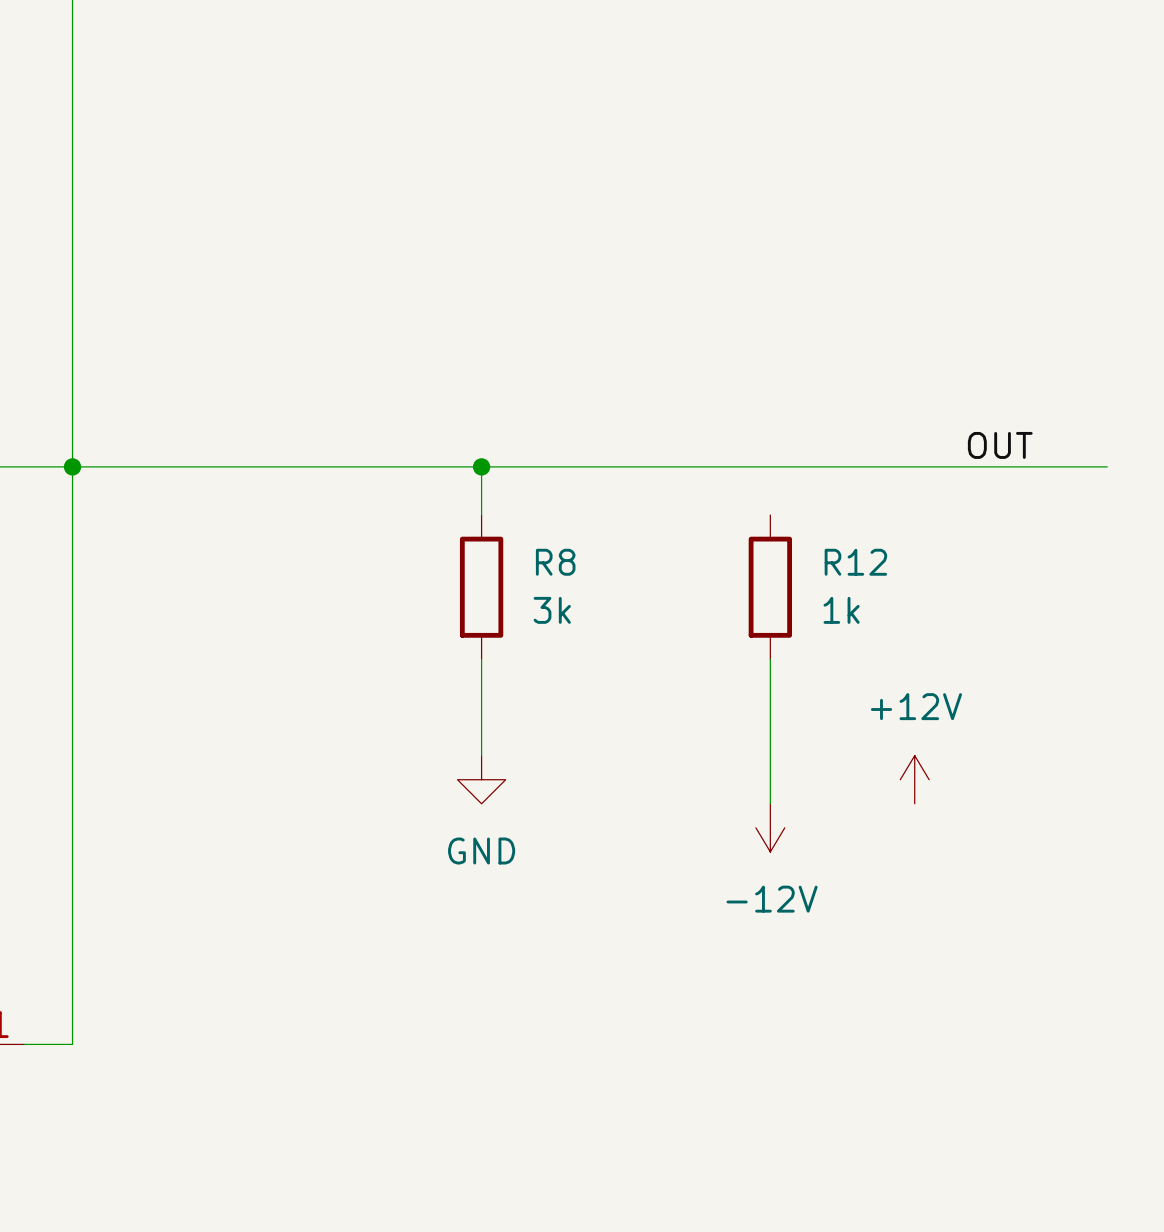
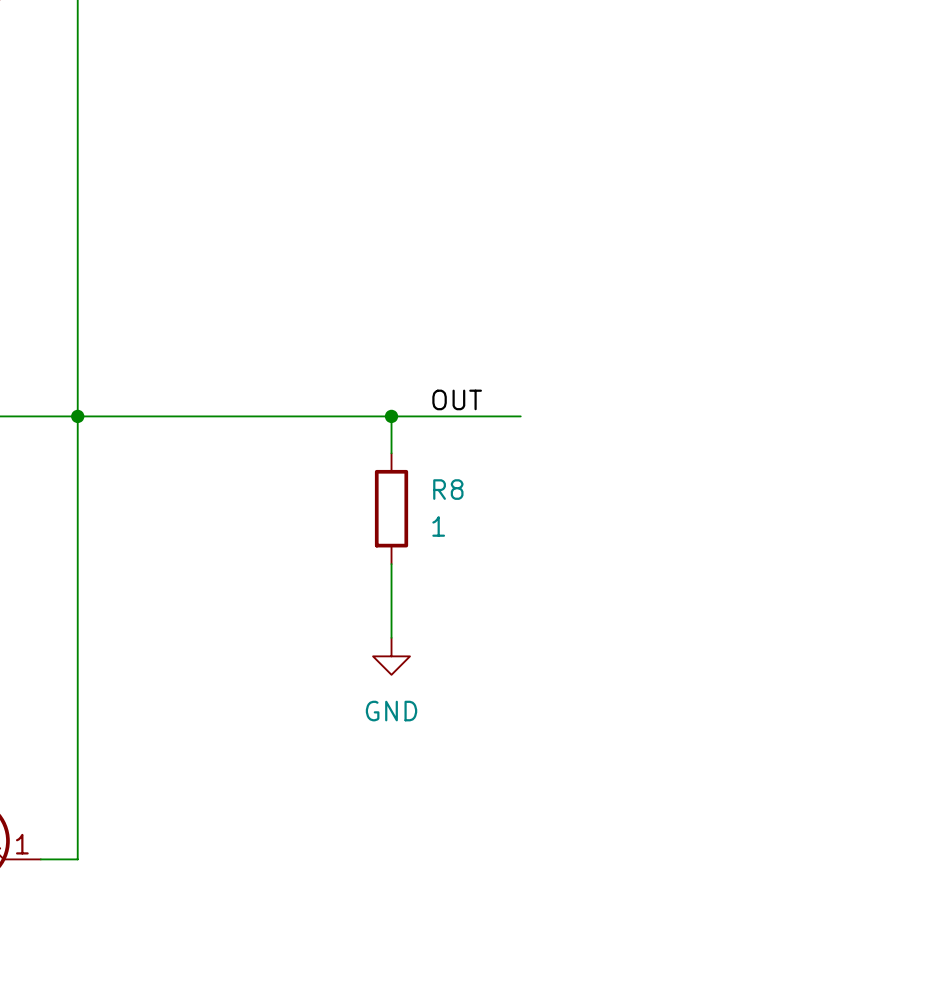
label position: OUT (1000, 445) -> OUT (457, 399)
wire: (650, 466) (1107, 466) -> none
R12: 1k (770, 587) -> none
R8 value: 3k (552, 610) -> 1 (438, 526)
wire: (770, 659) (770, 803) -> none
power symbol: +12V (914, 779) -> none
power symbol: -12V (770, 827) -> none

